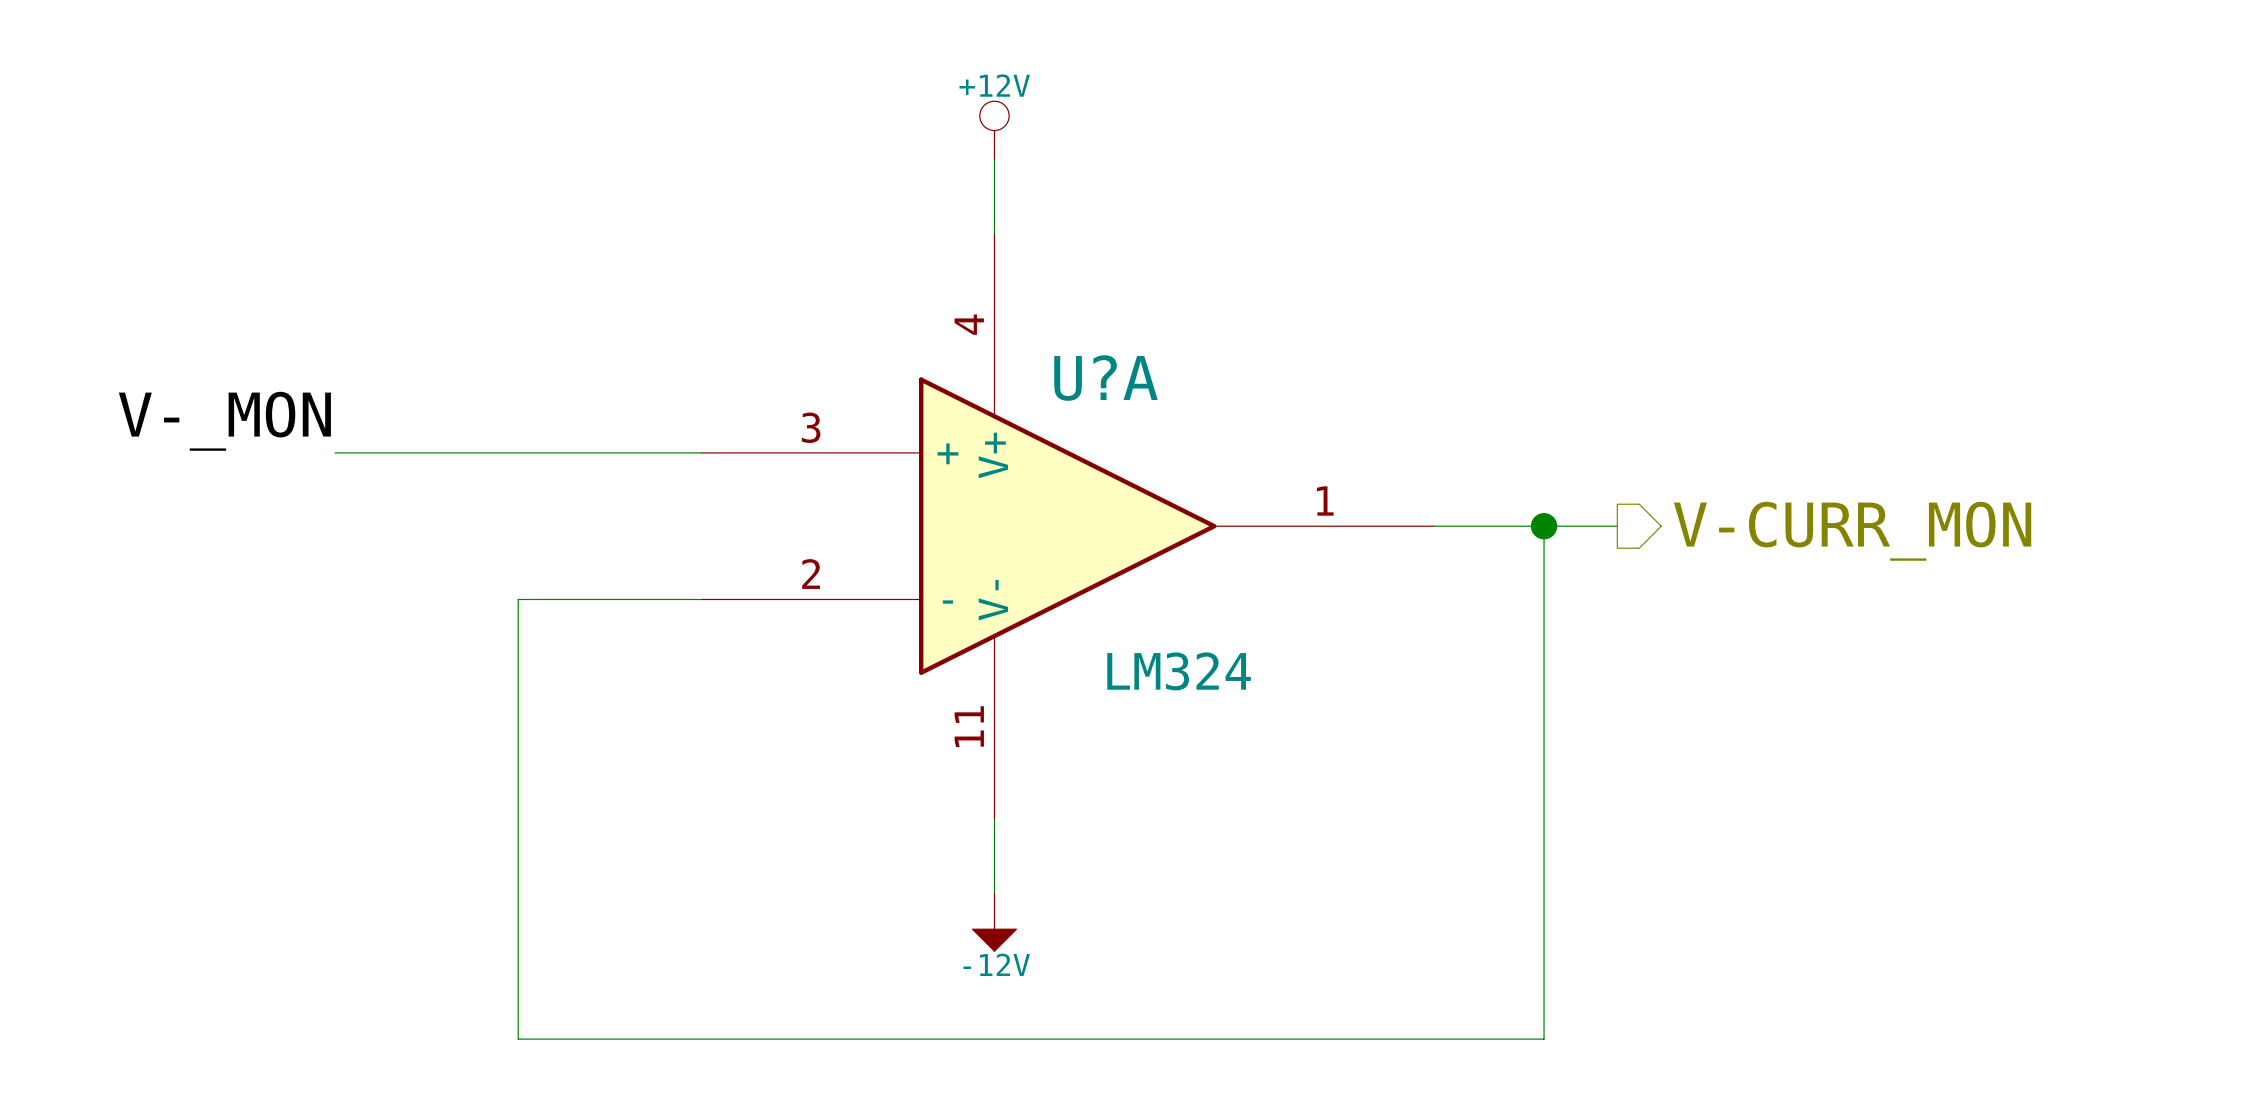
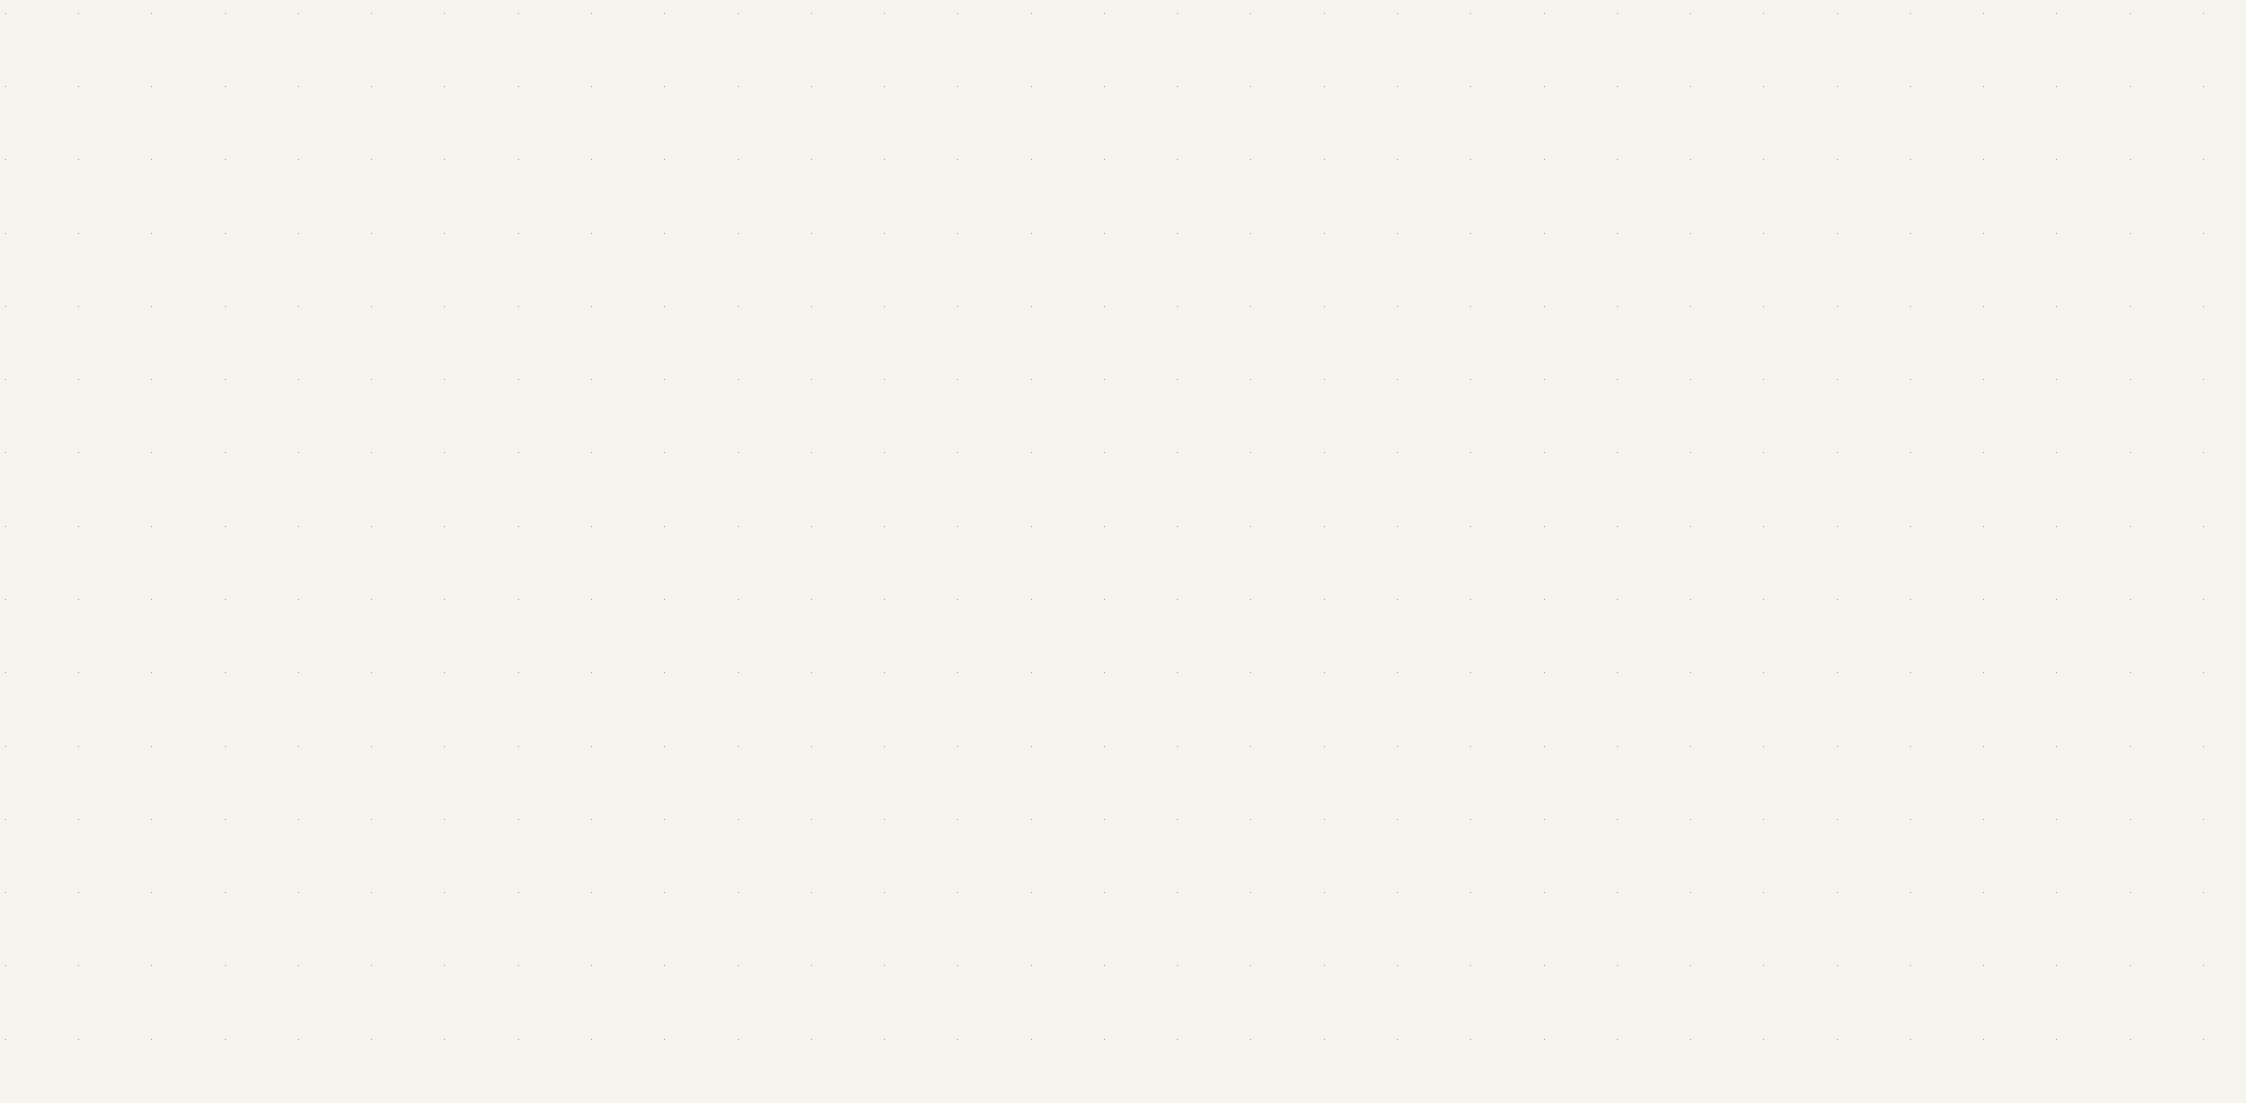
power symbol: +12V (994, 130) -> none
wire: (994, 159) (994, 233) -> none
label: V-_MON (224, 421) -> none
wire: (335, 452) (701, 452) -> none
U?A: LM324 (1067, 526) -> none
wire: (1434, 526) (1617, 526) -> none
wire: (1544, 526) (1544, 1039) (518, 1039) (518, 599) (701, 599) -> none
junction: (1544, 526) -> none
hierarchical label: V-CURR_MON (1852, 531) -> none
wire: (994, 819) (994, 892) -> none
power symbol: -12V (994, 921) -> none

